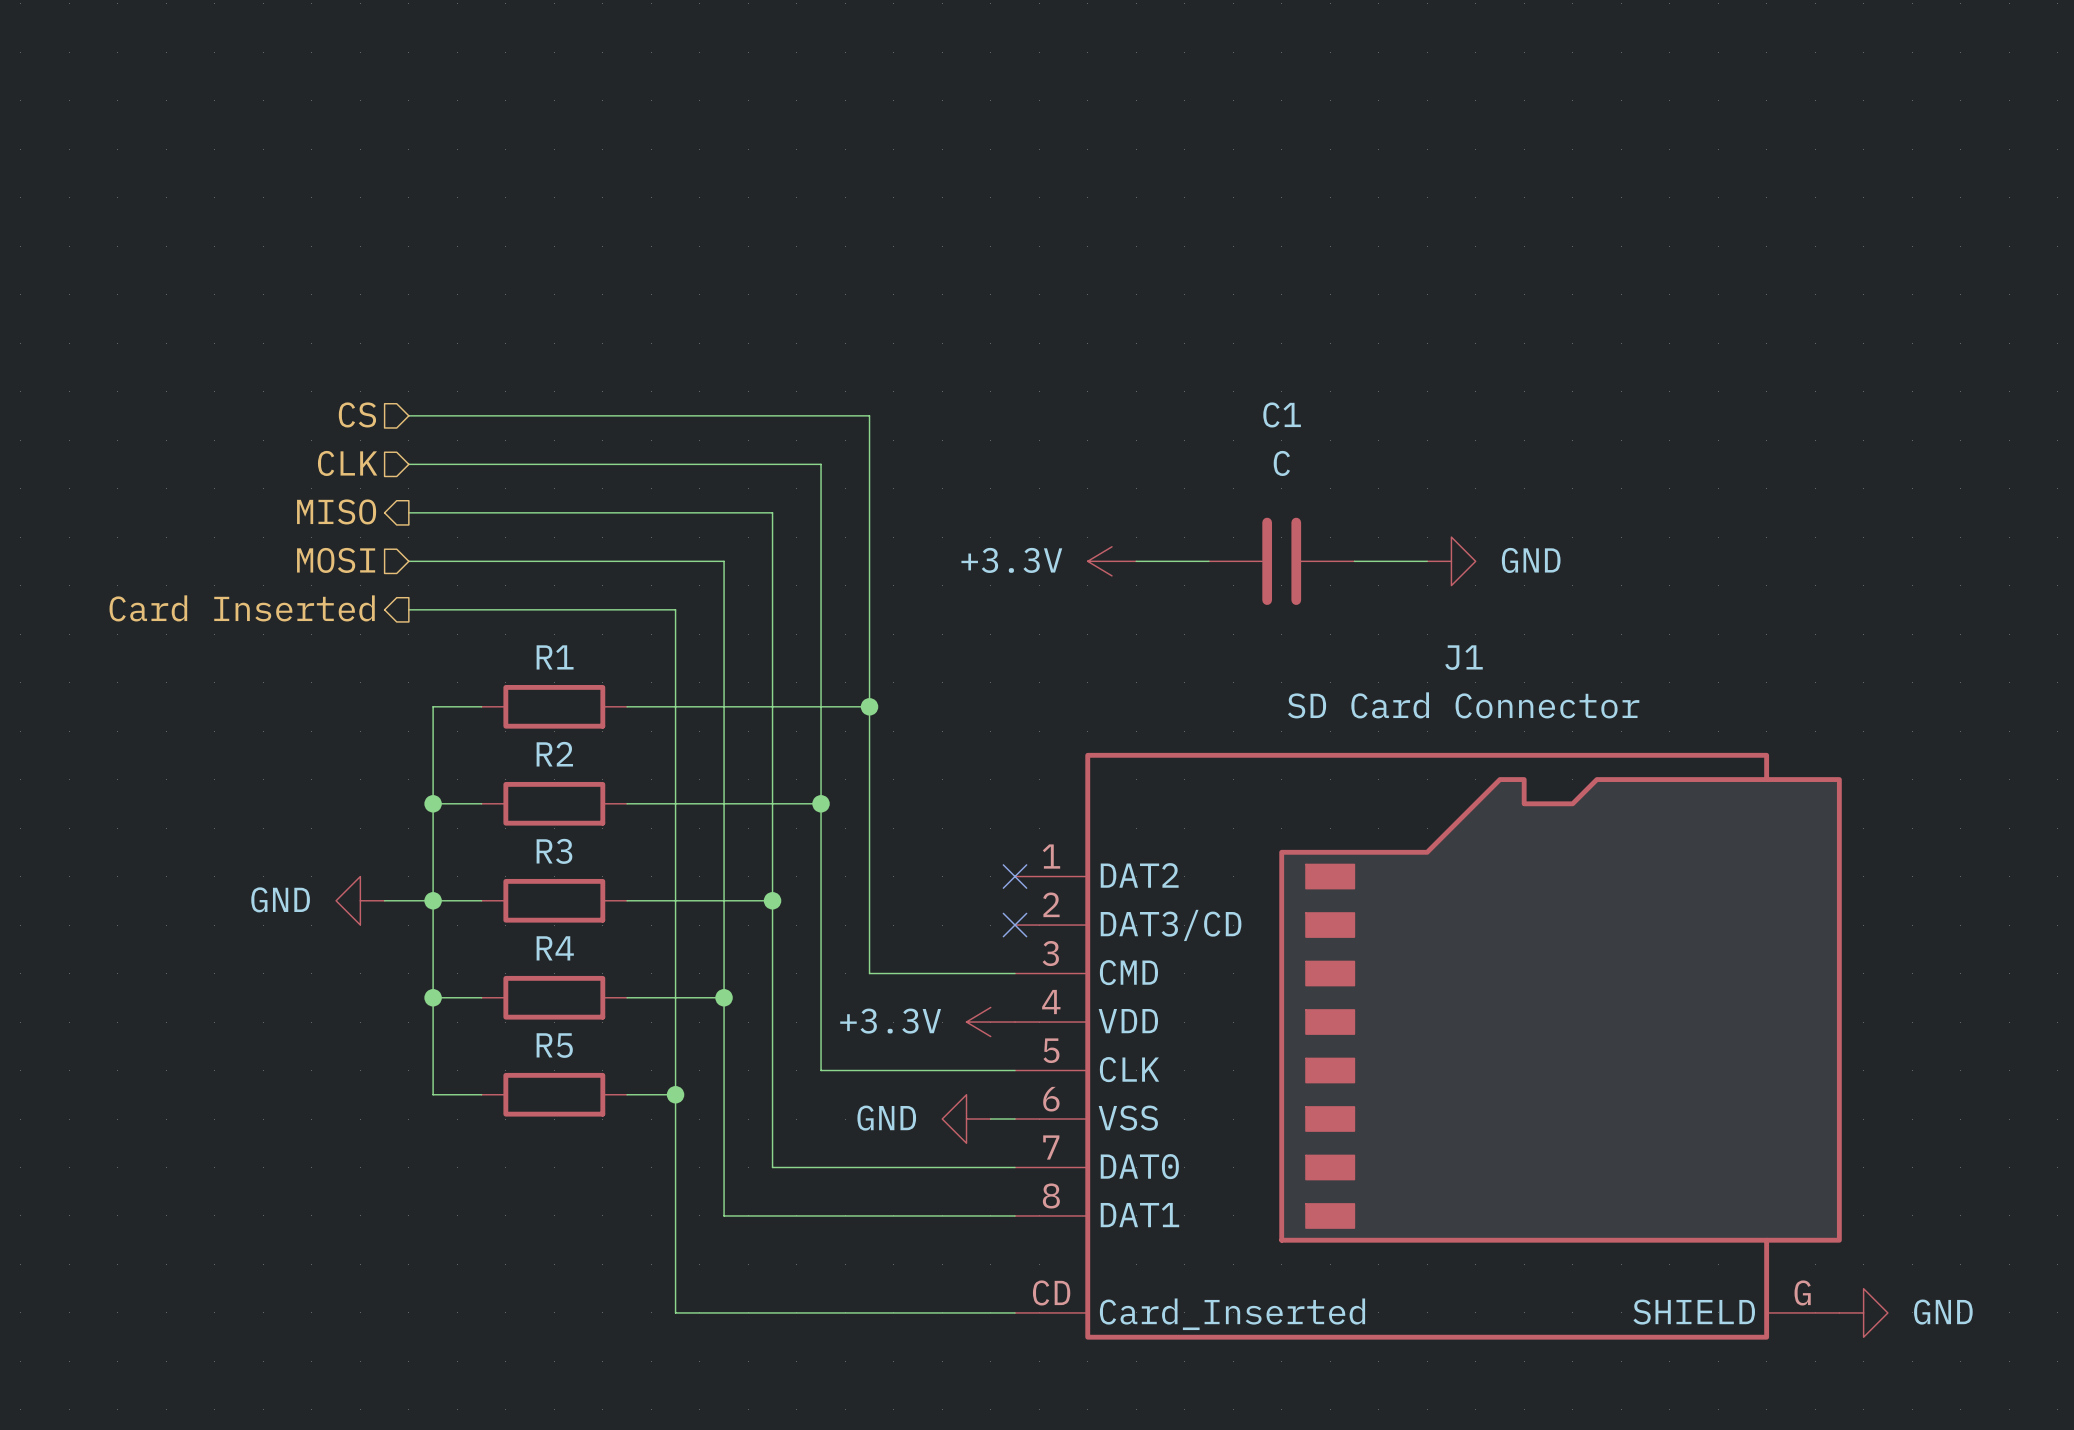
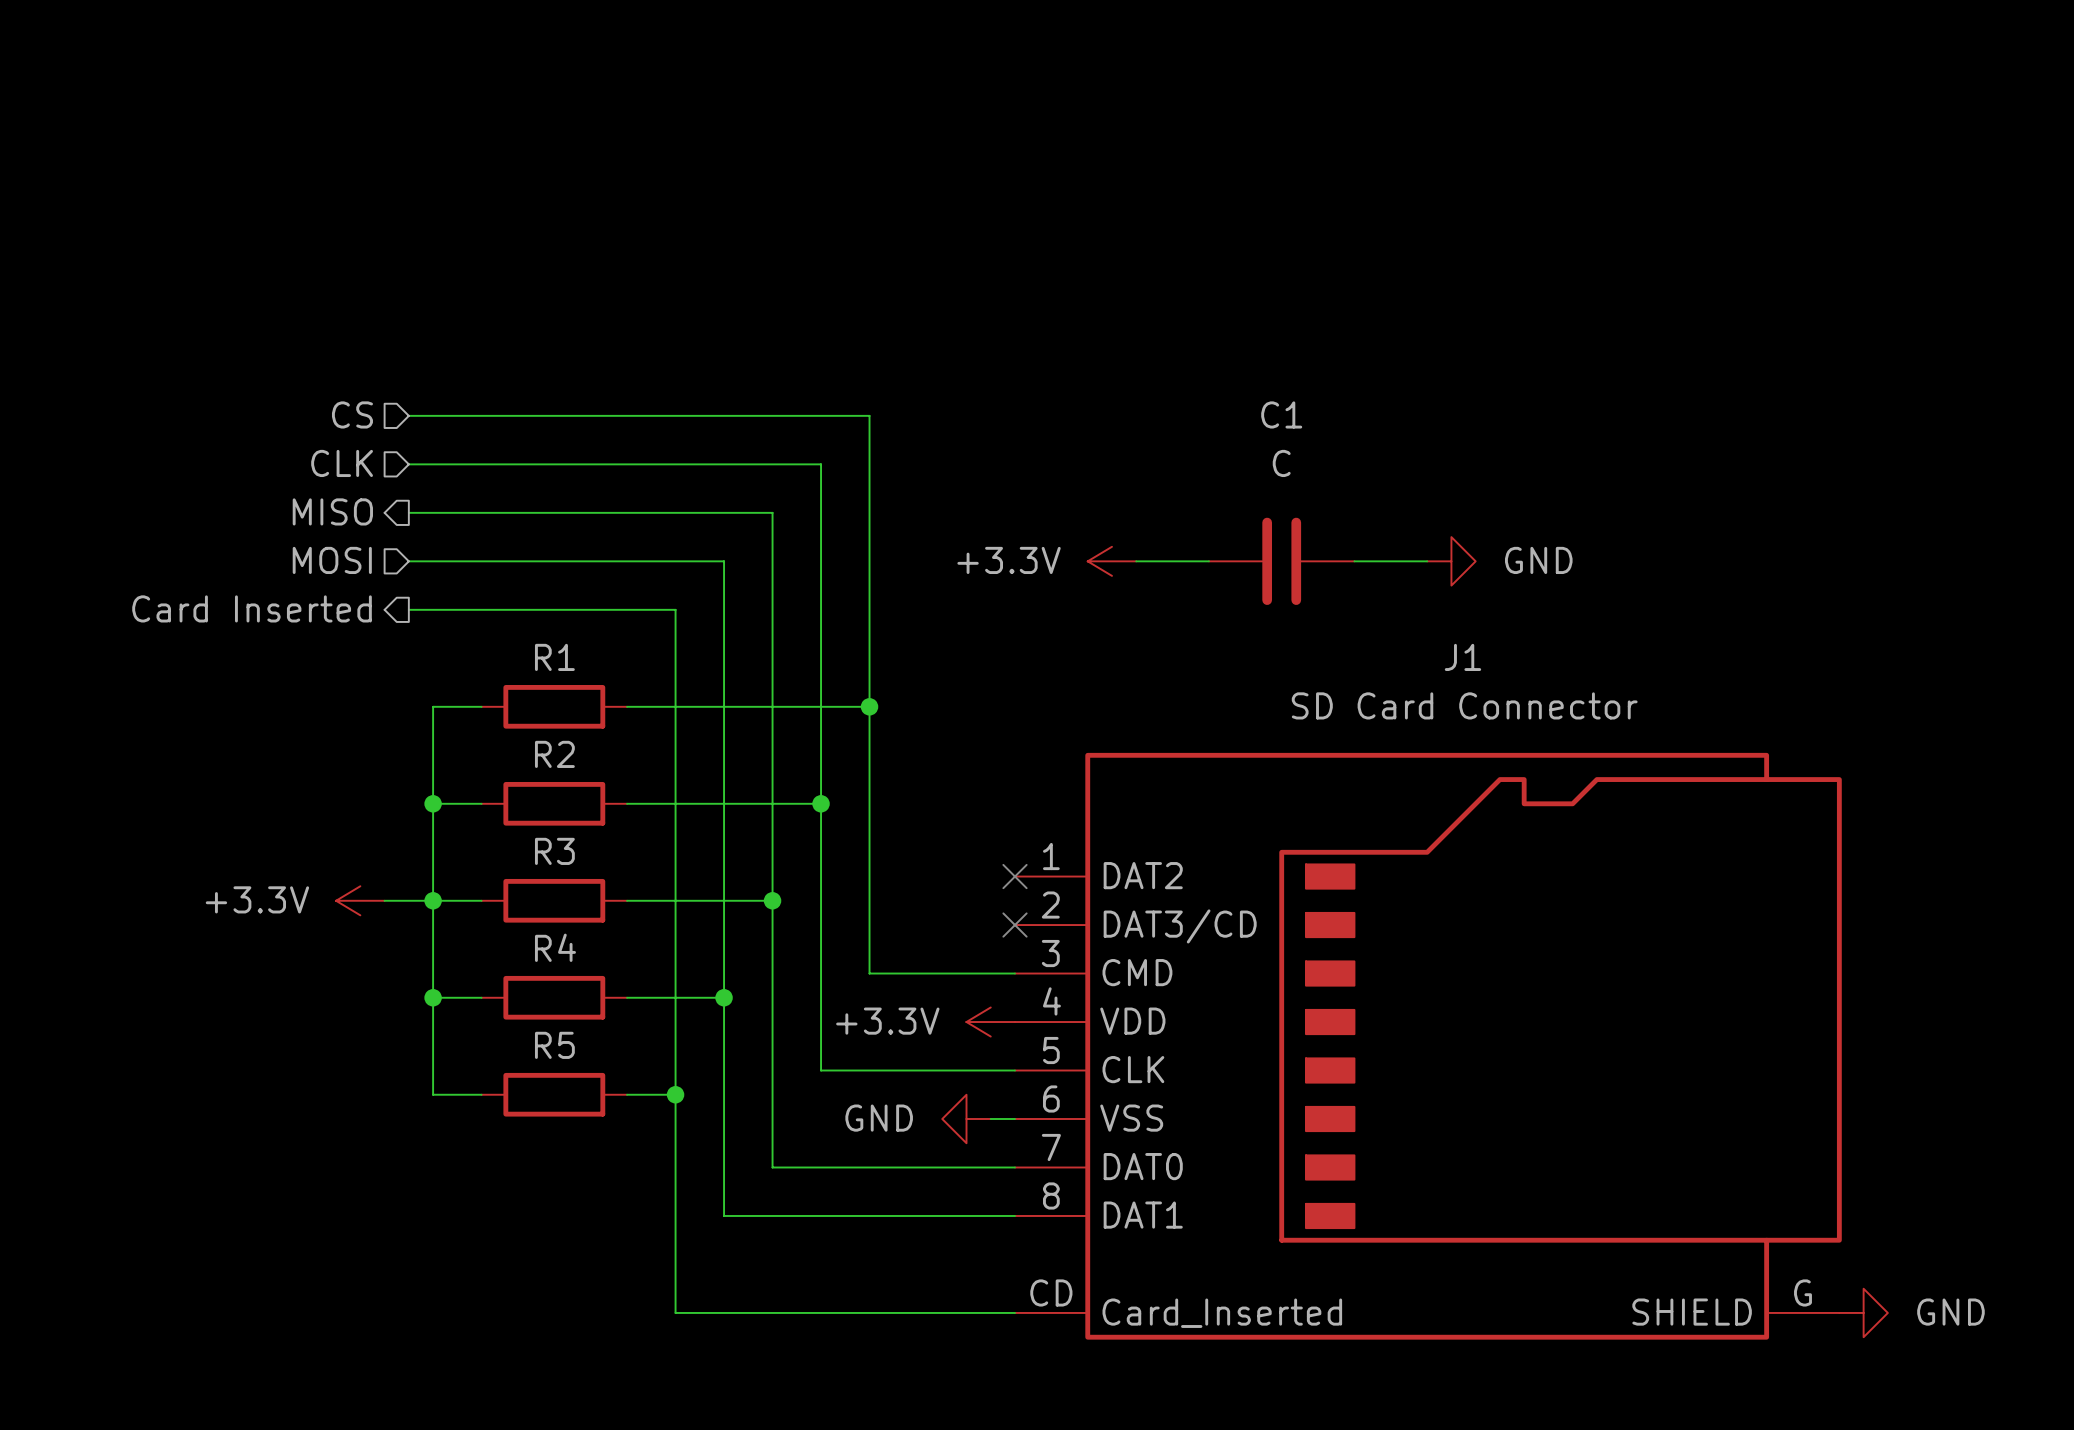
power symbol: GND (360, 900) -> +3.3V (360, 900)

